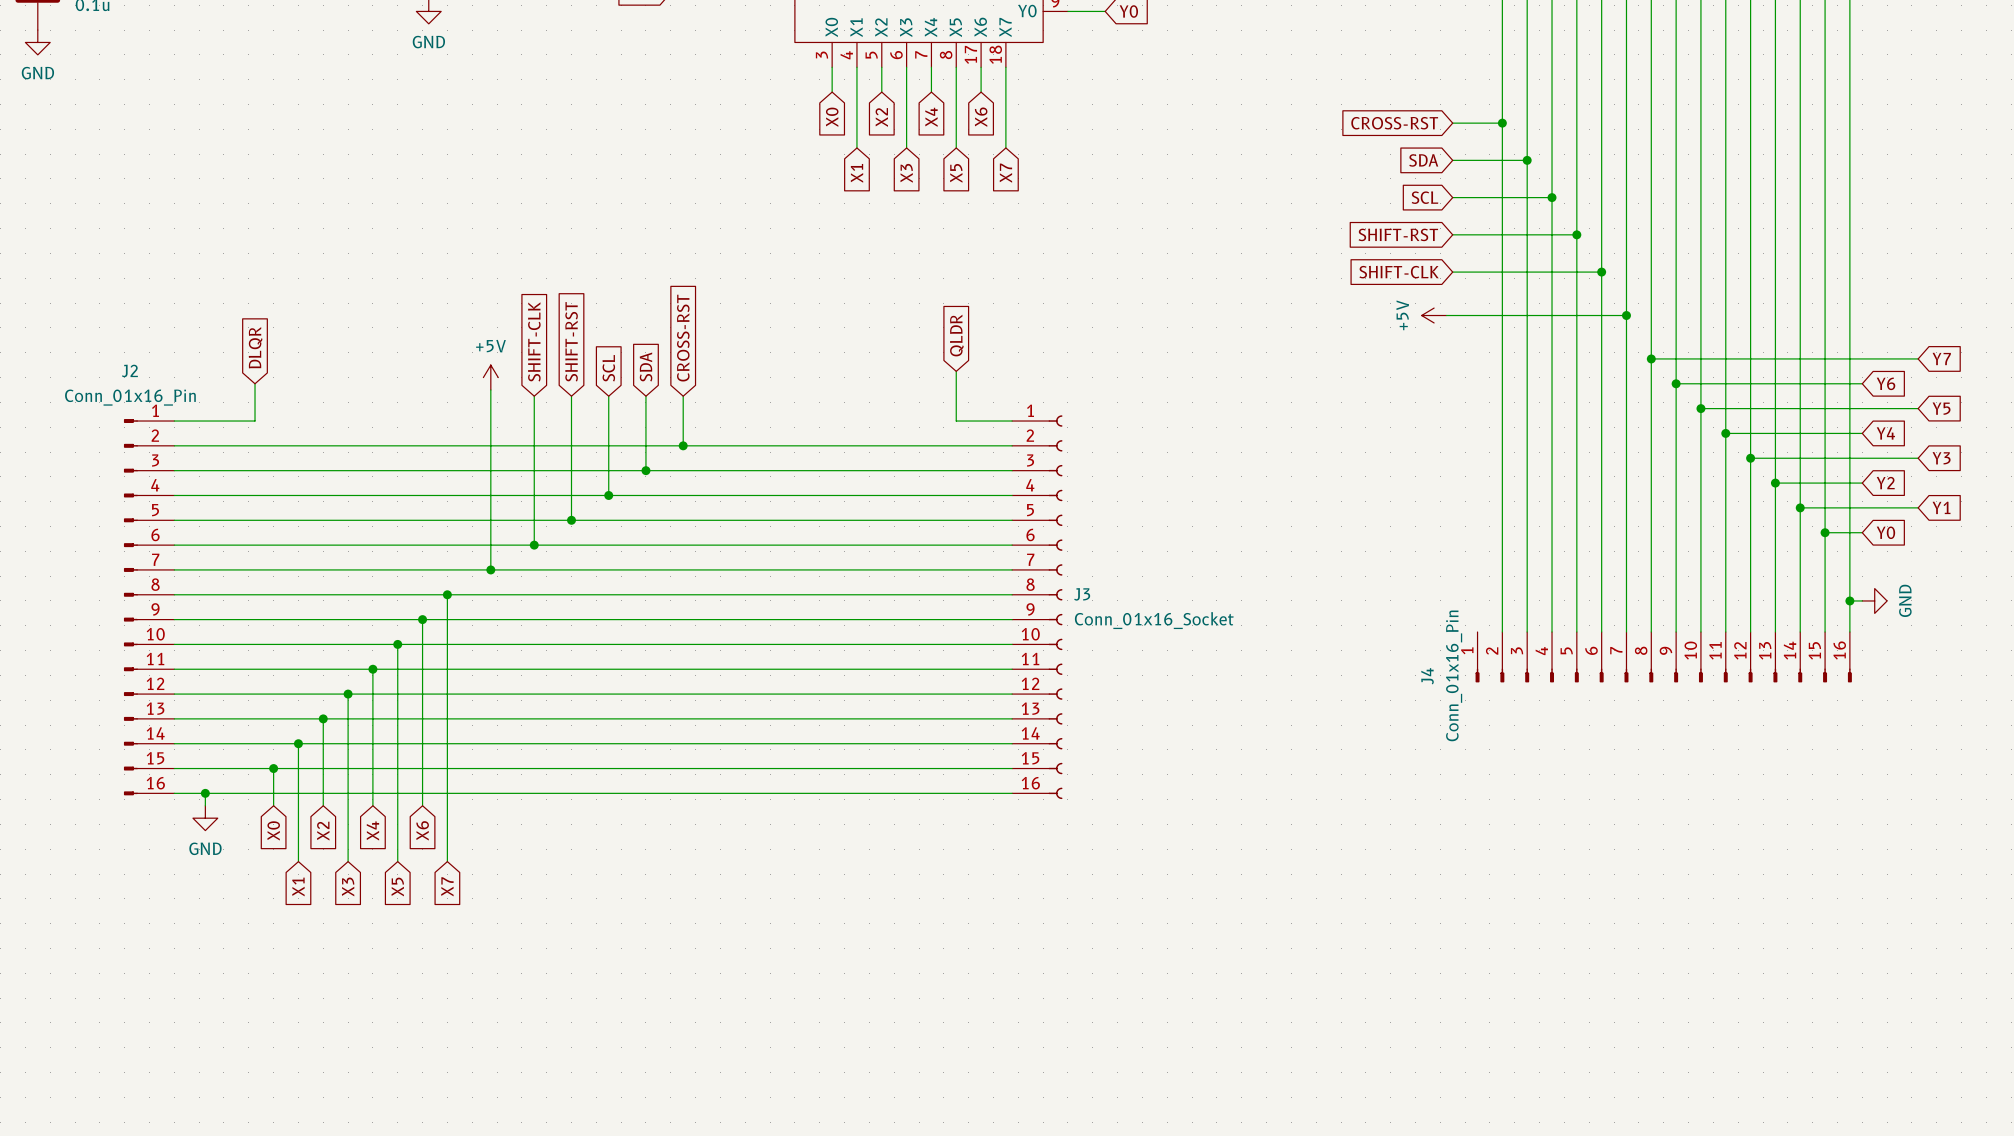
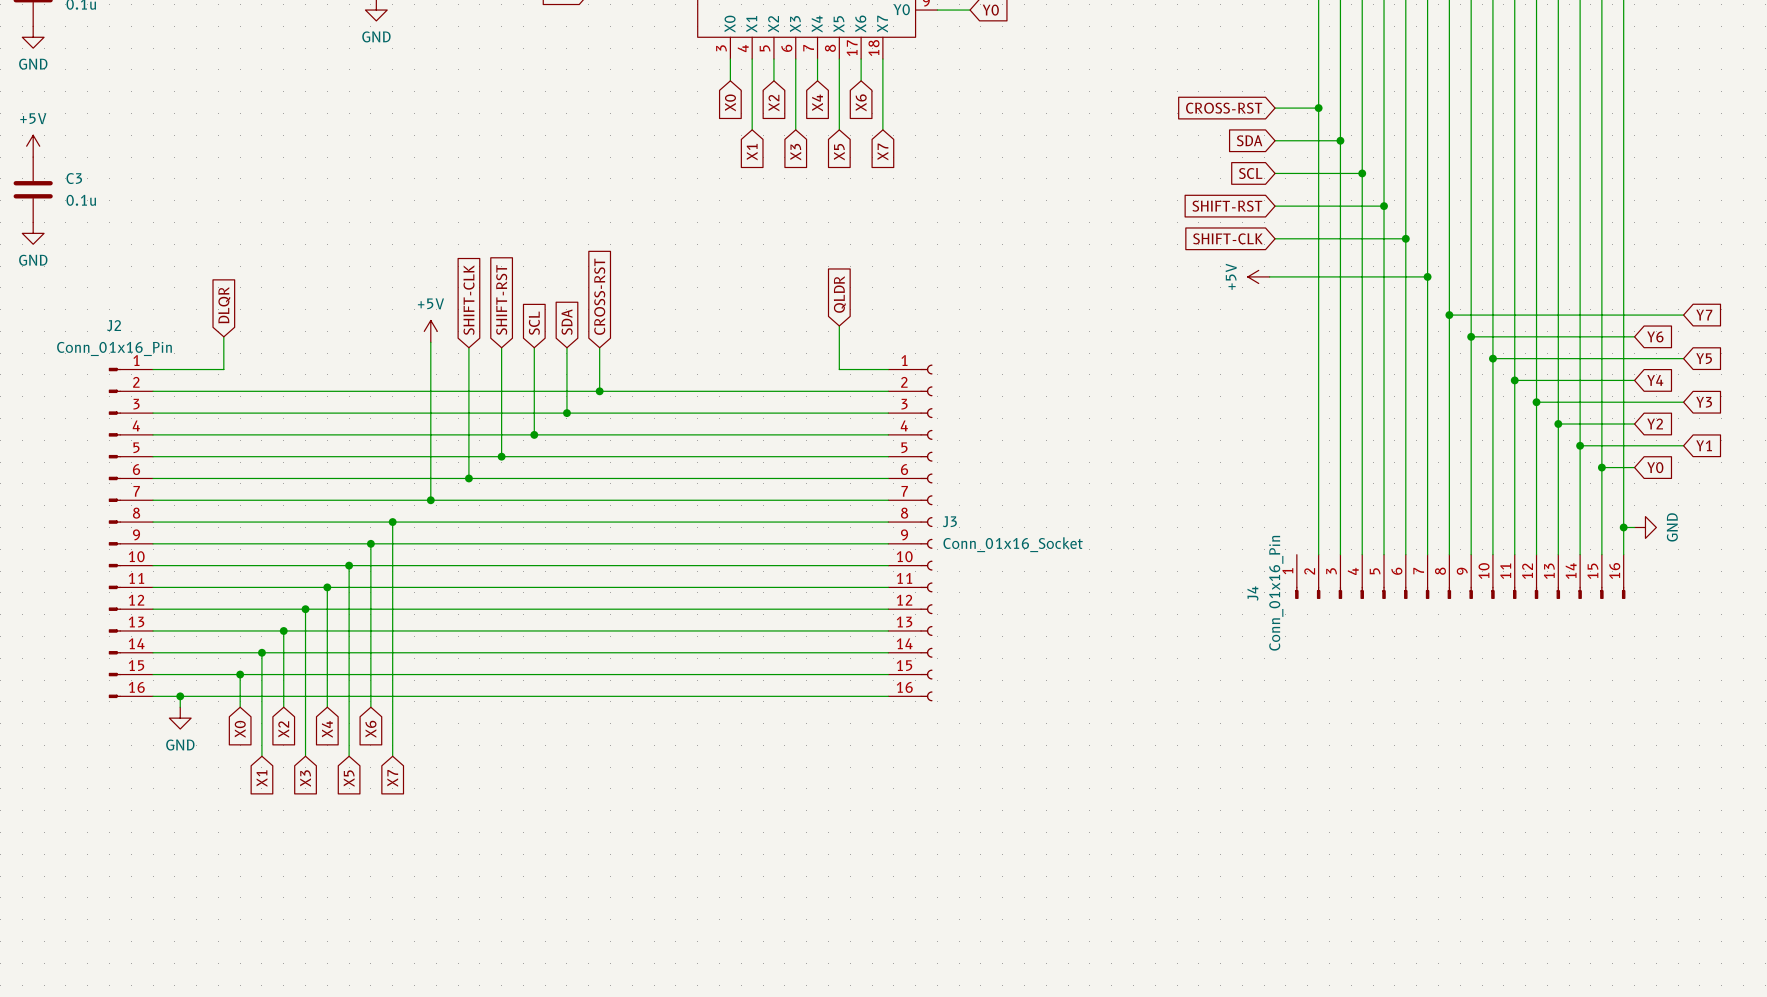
power symbol: none -> +5V (33, 146)
C3: none -> 0.1u (33, 189)
power symbol: none -> GND (33, 233)

